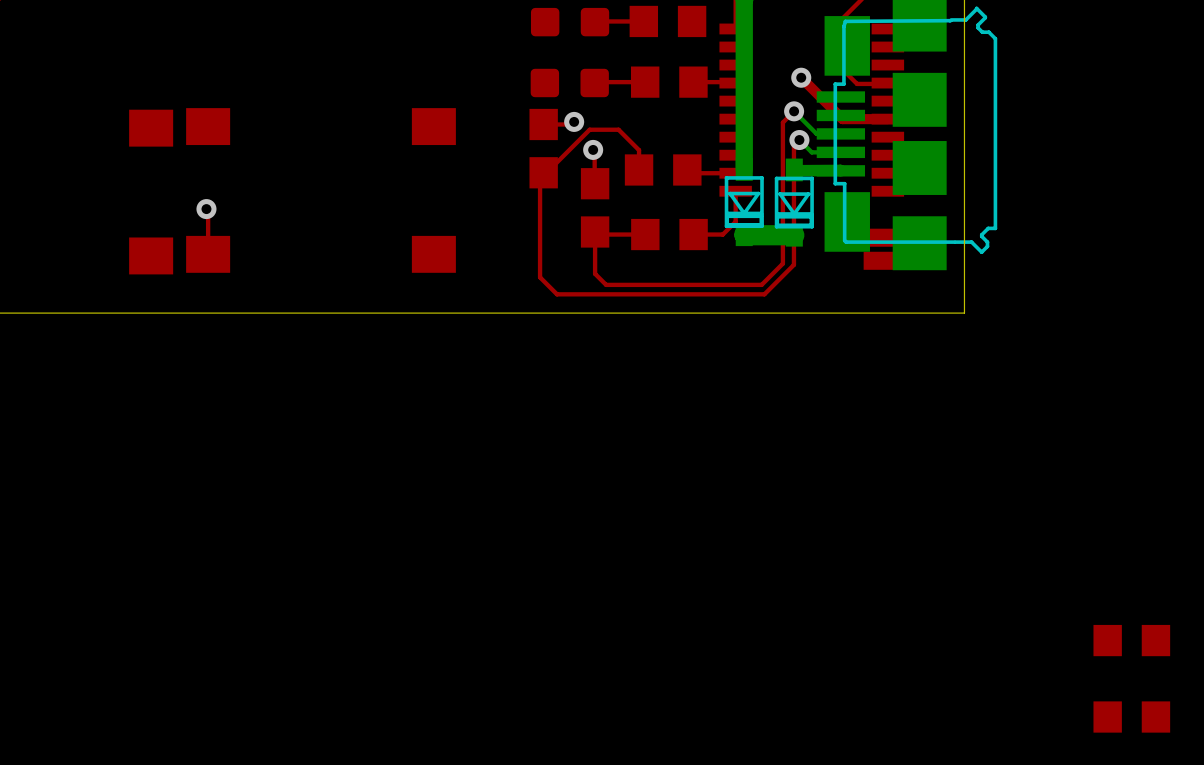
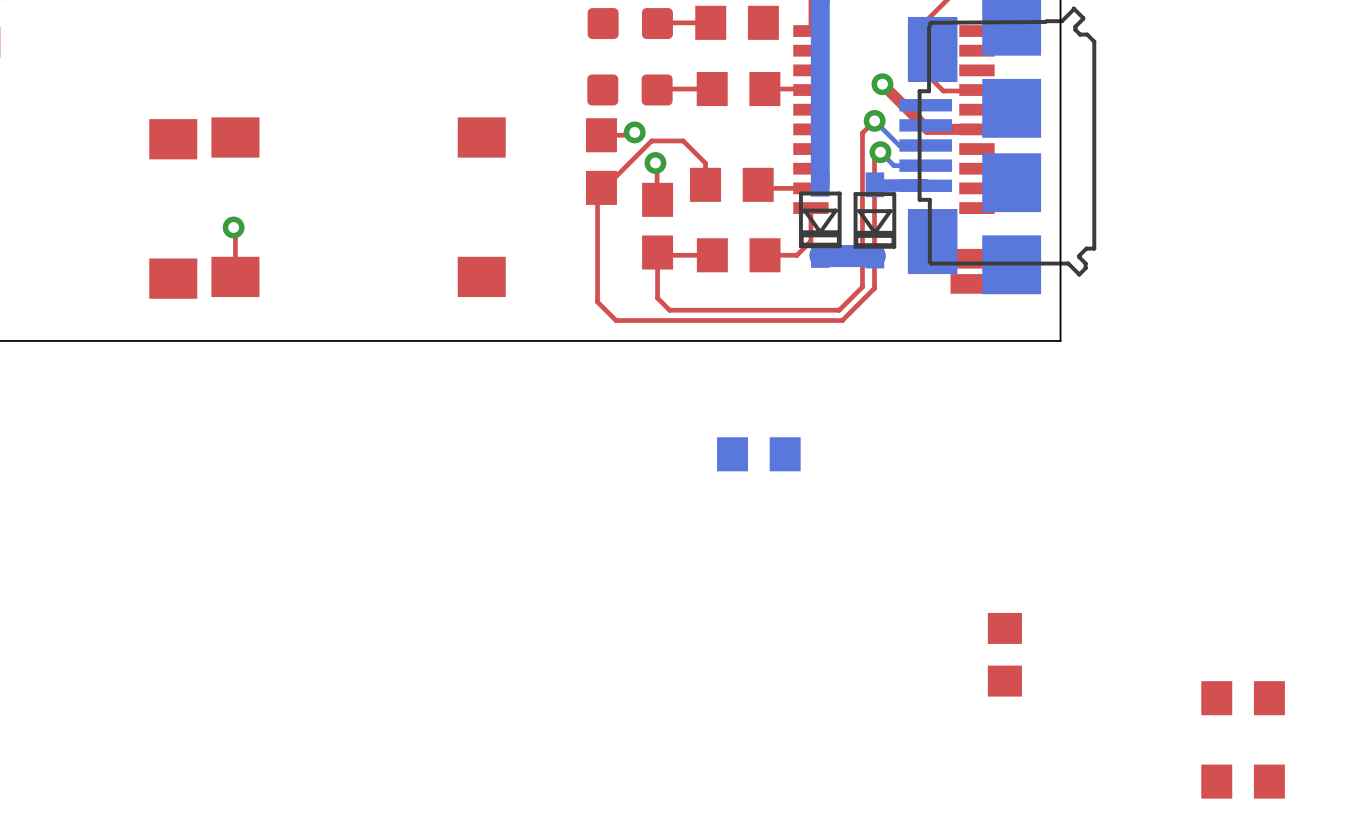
part: none -> (758, 454)
part: none -> (1004, 654)

